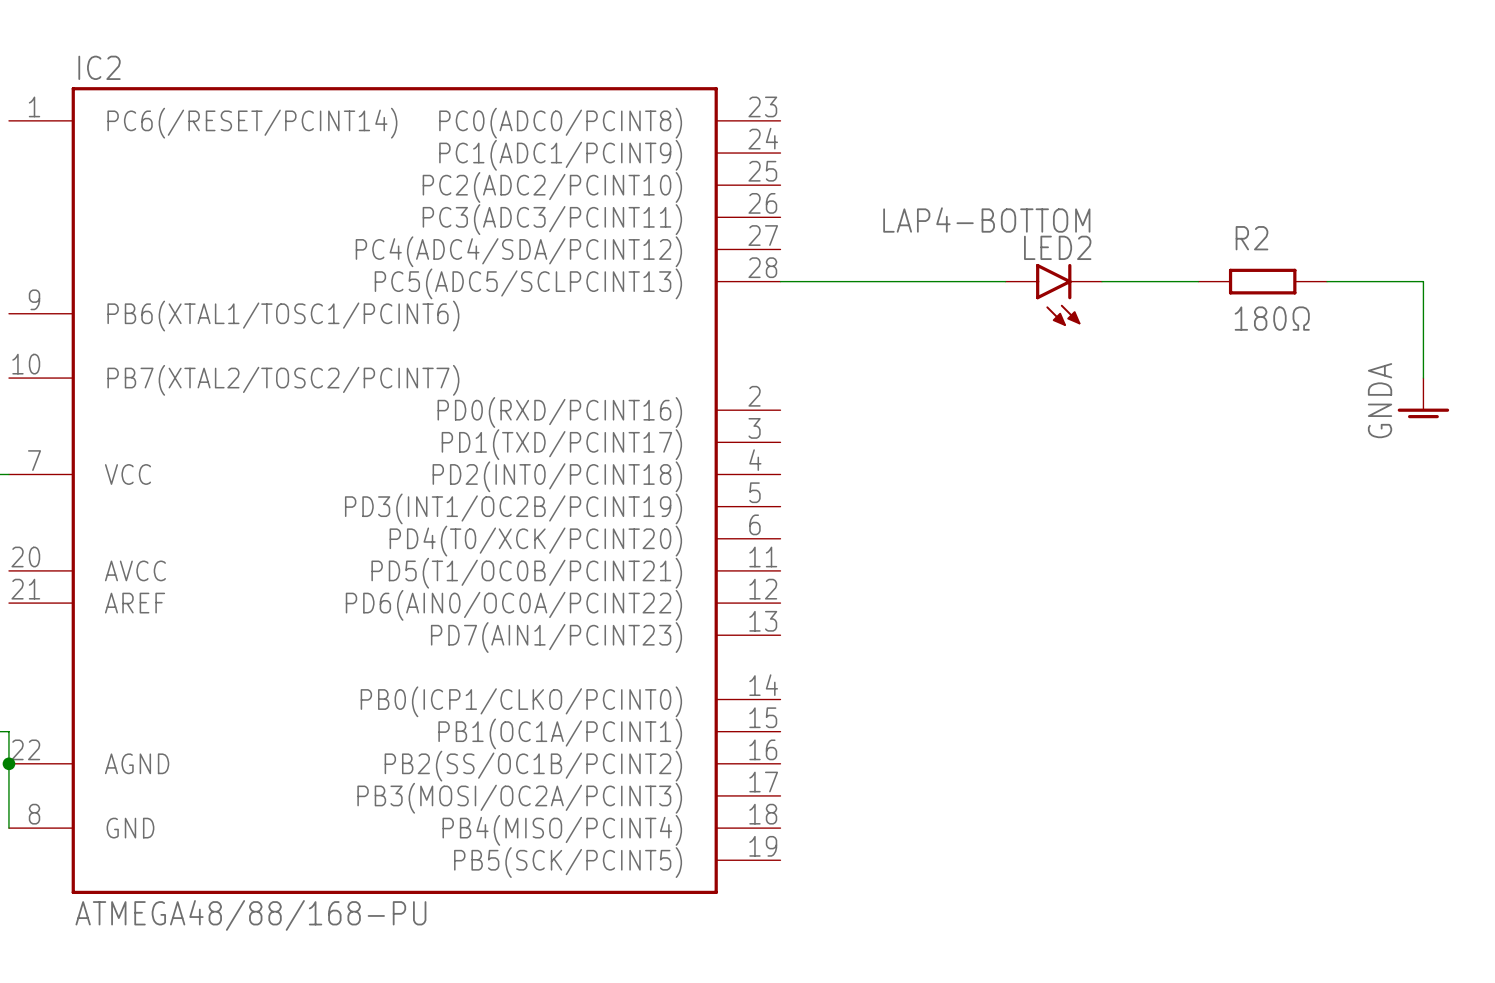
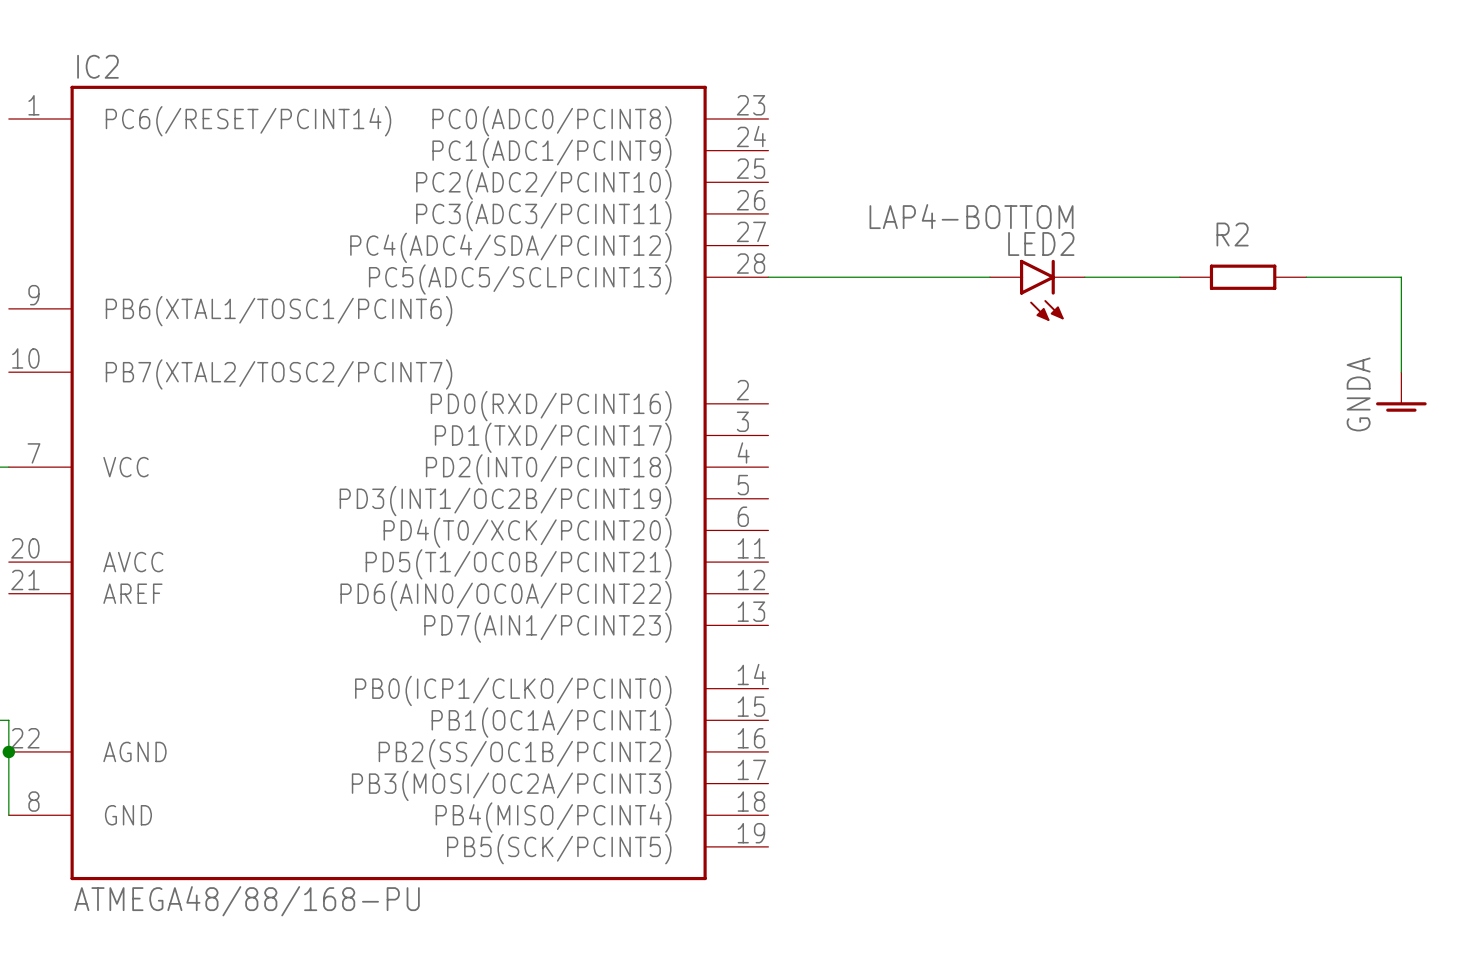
R2 value: 180Ω (1272, 318) -> none

